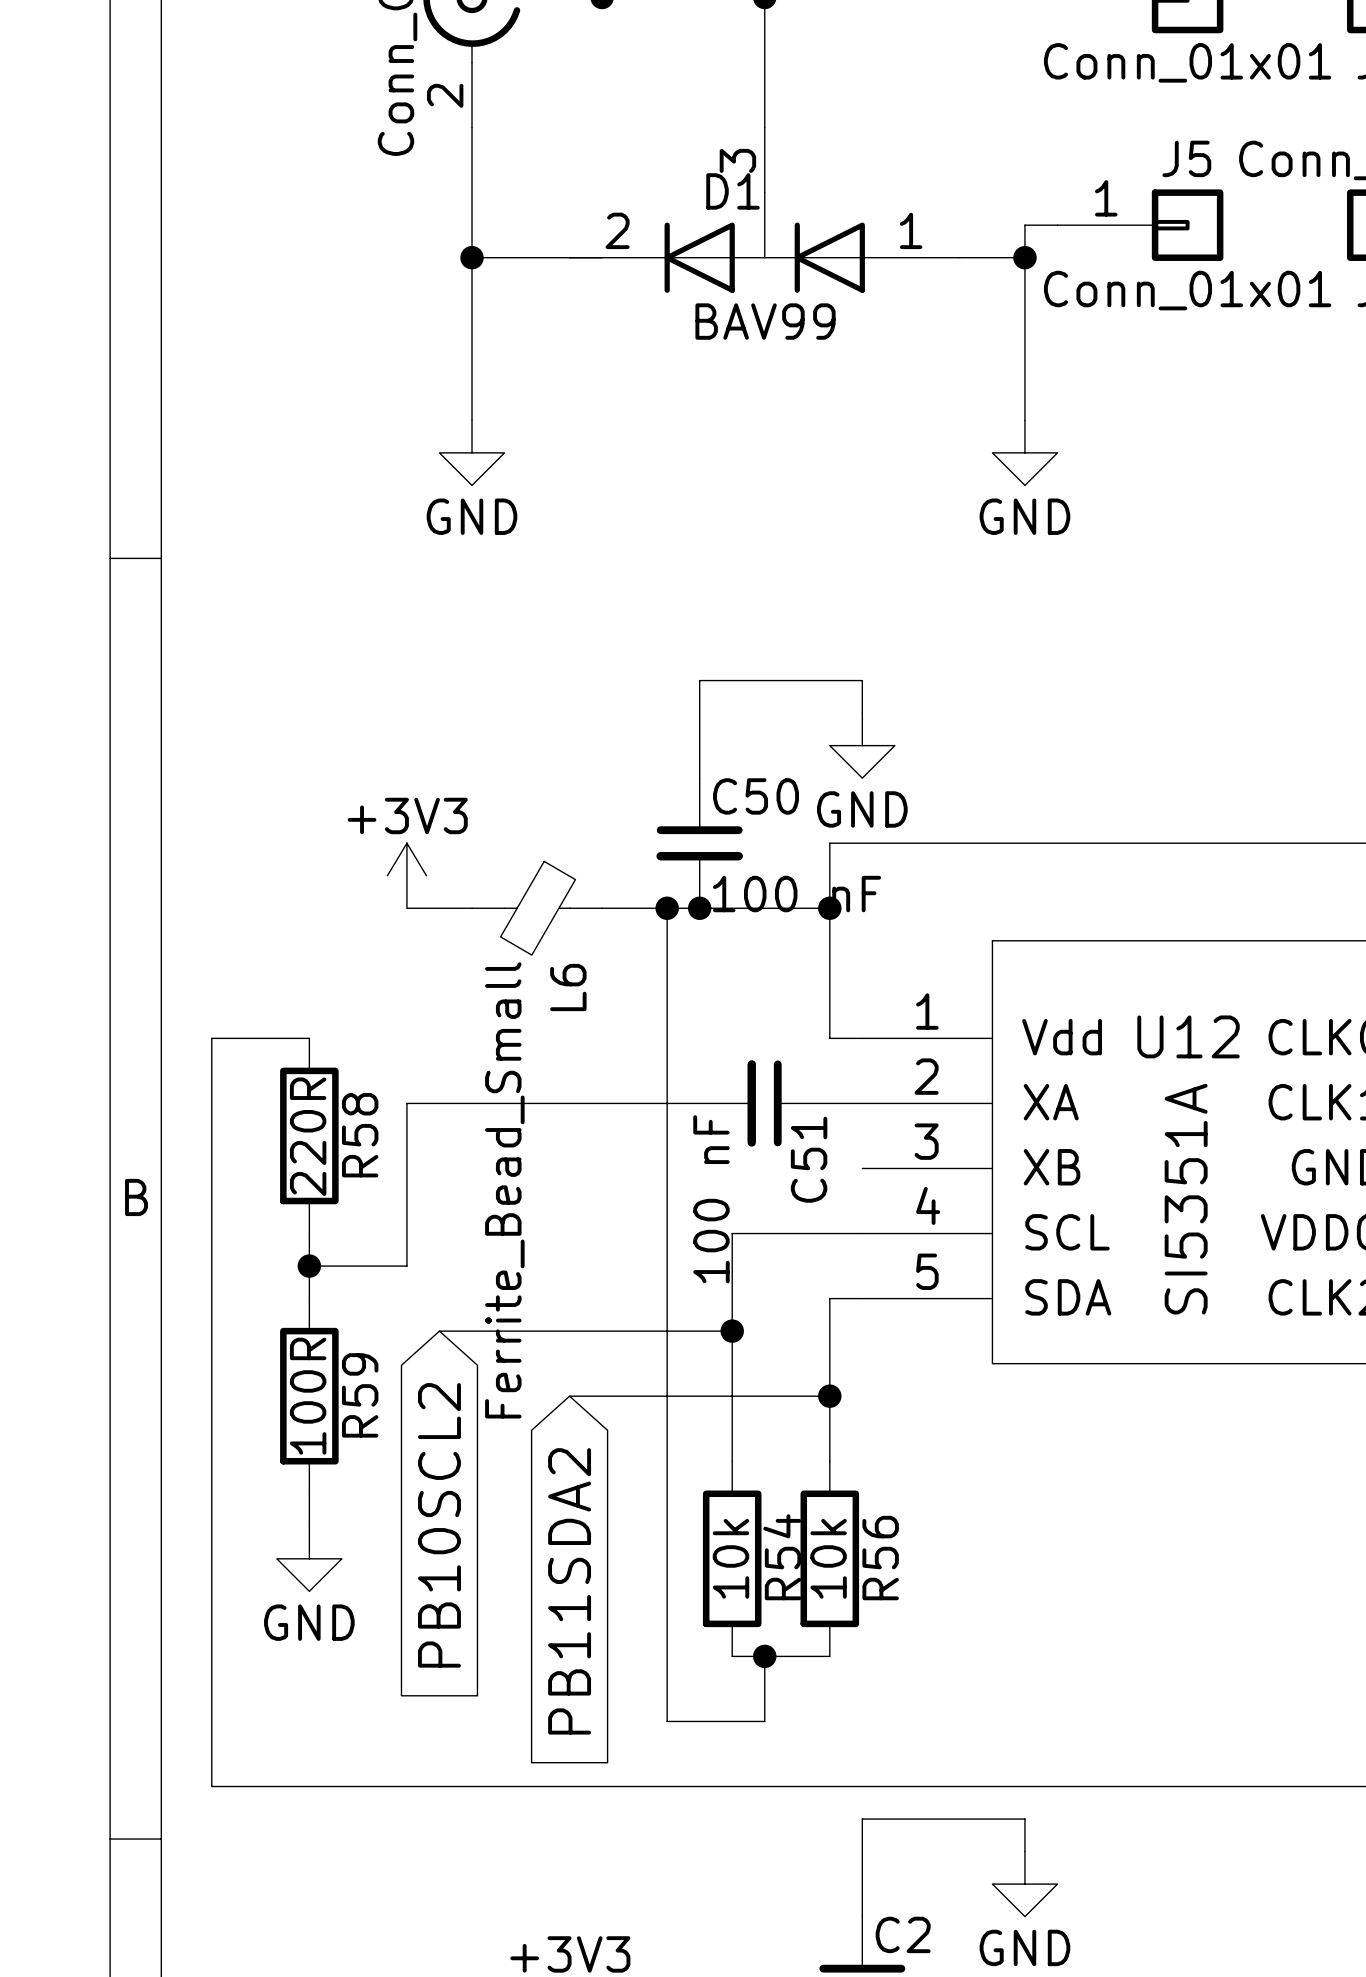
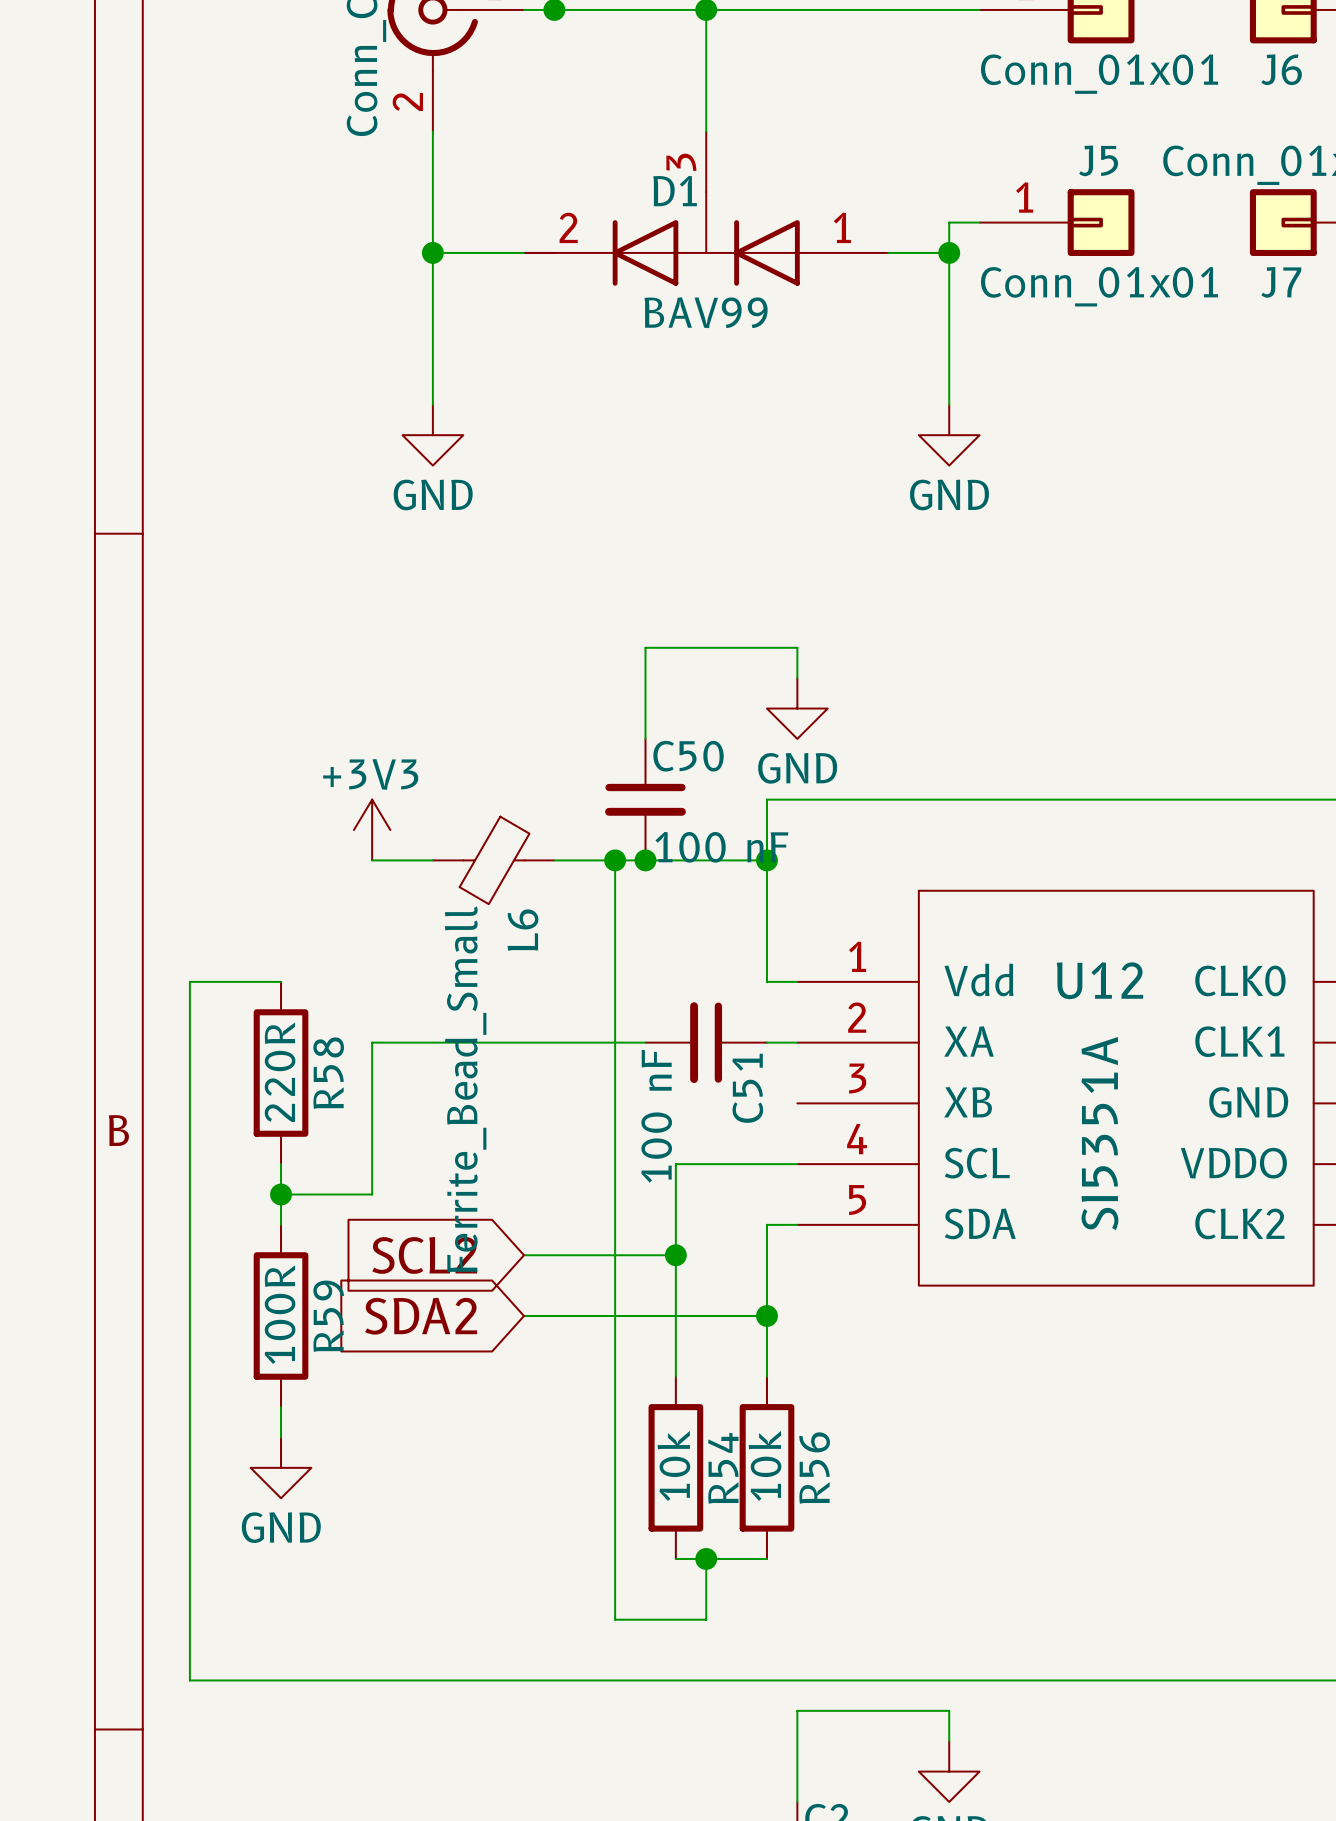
wire: (439, 1331) (569, 1331) -> none
global label: PB10SCL2 (439, 1525) -> SCL2 (424, 1255)
global label: PB11SDA2 (569, 1591) -> SDA2 (421, 1316)

